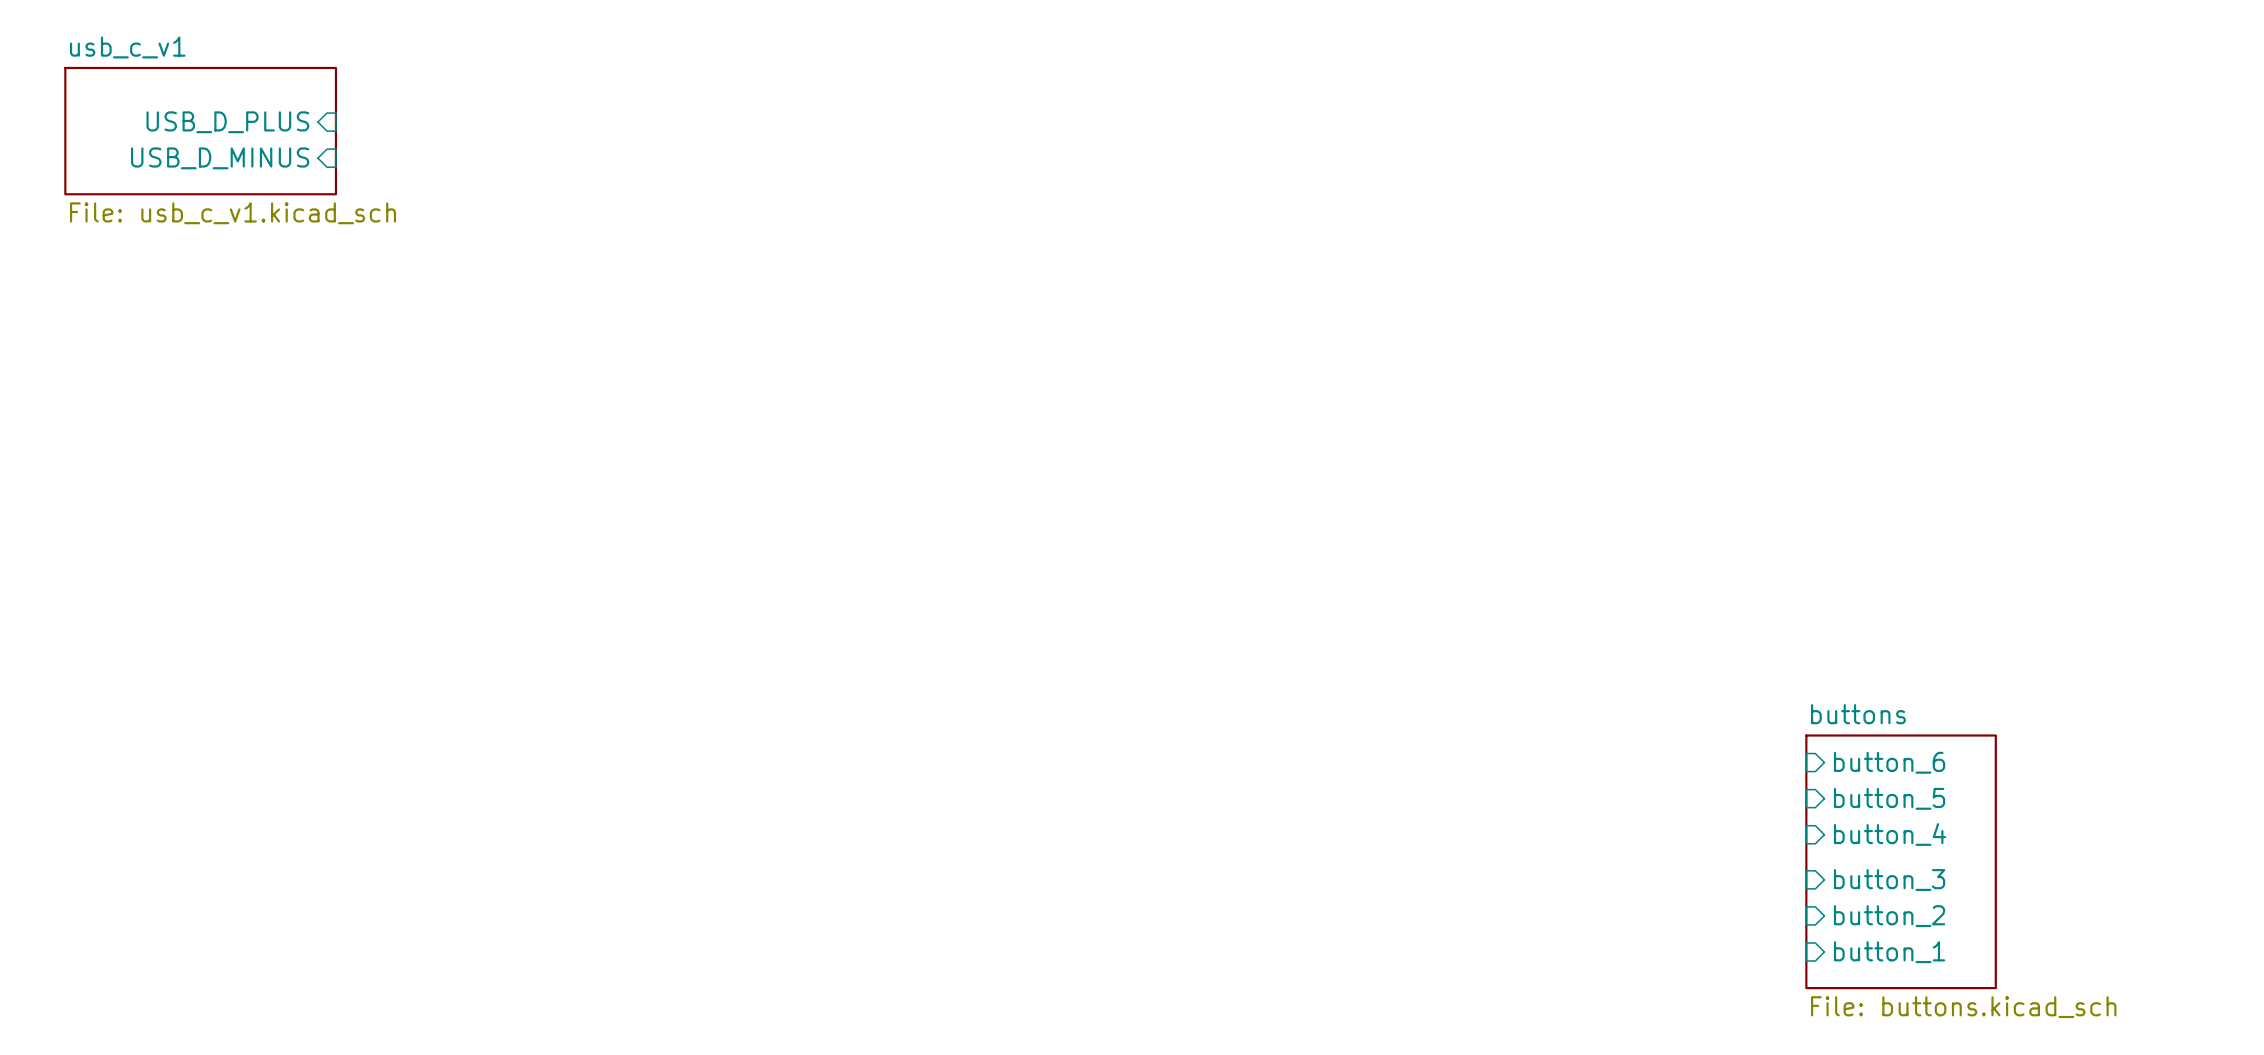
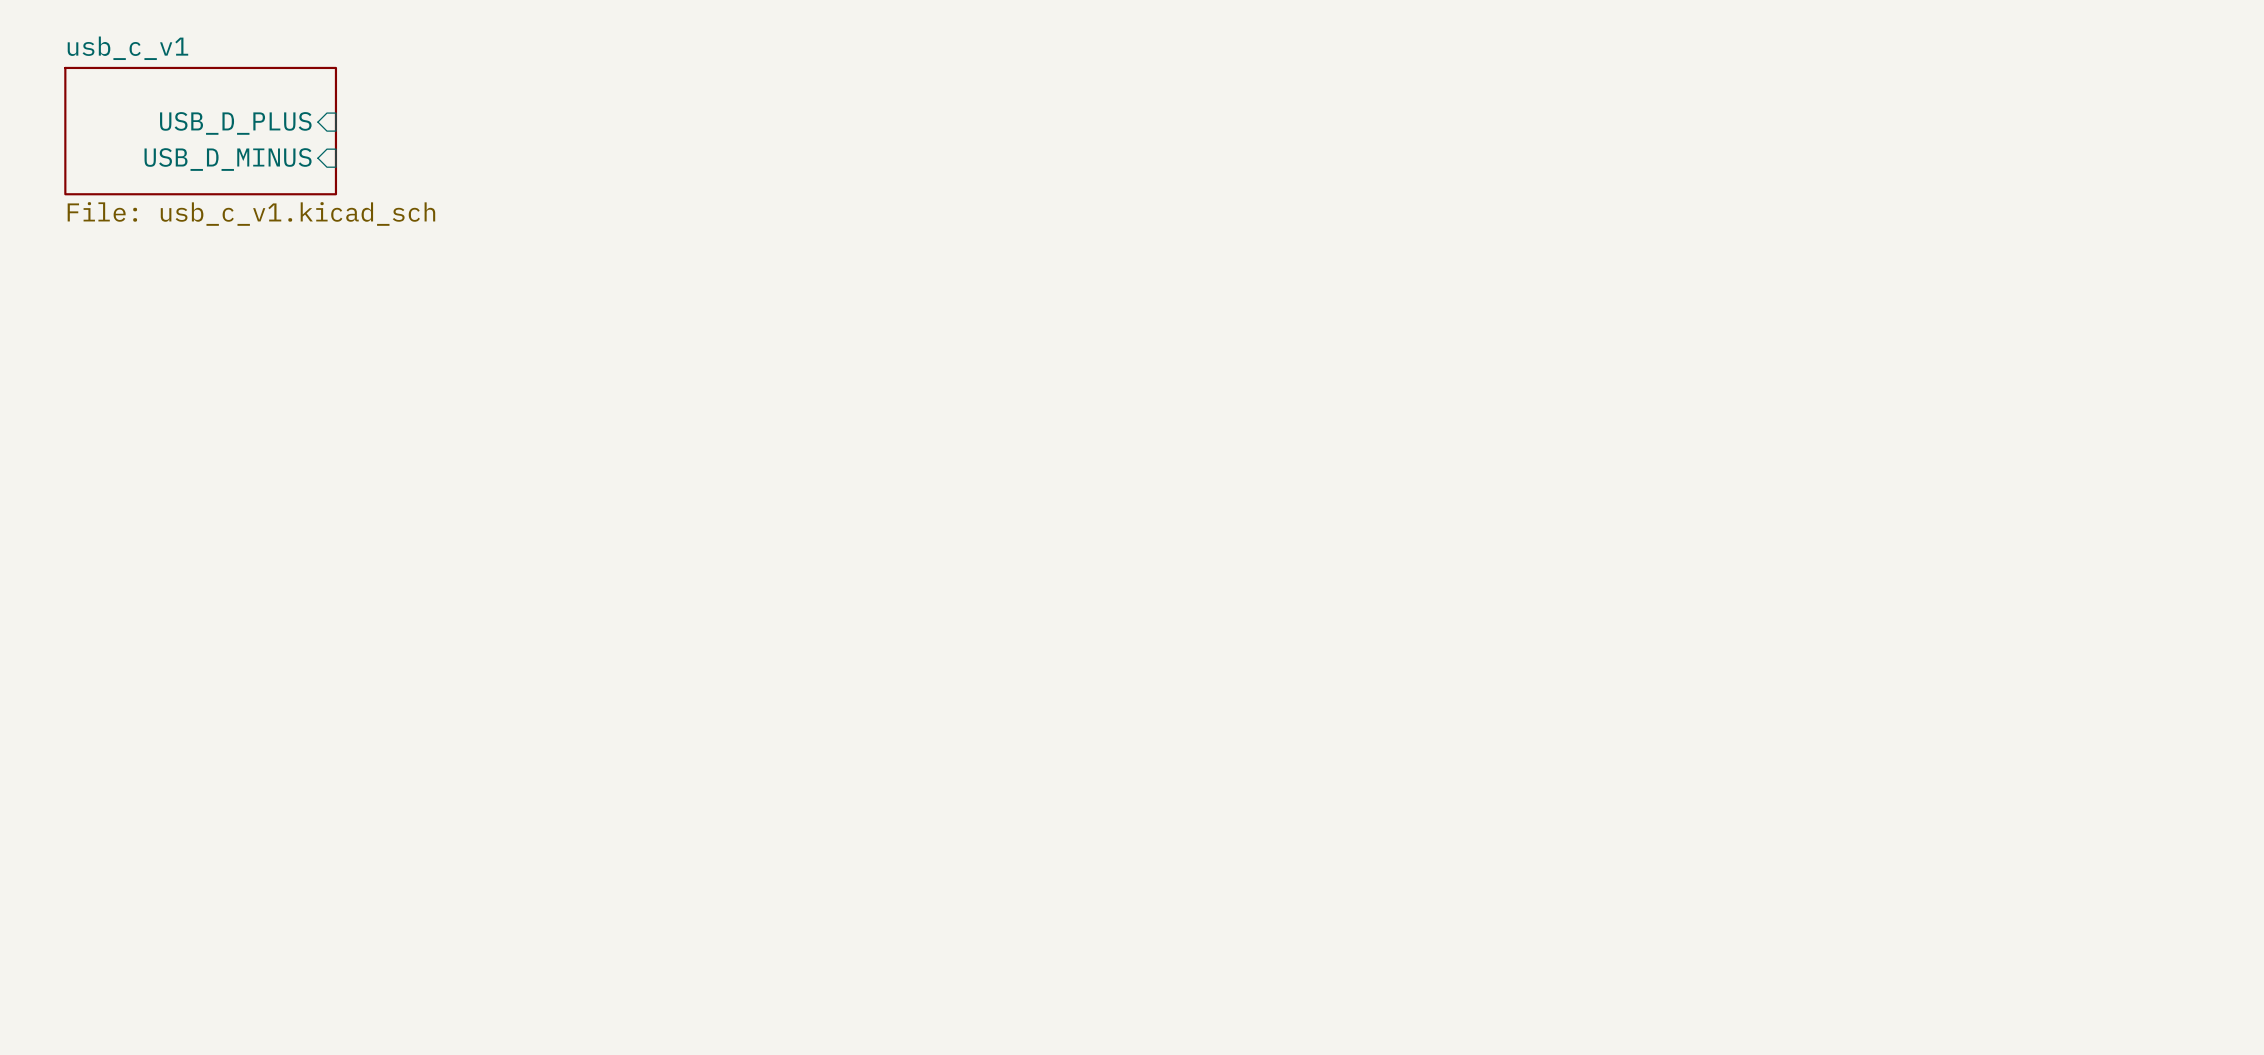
sheet pin: button_6 (1889, 762) -> none
sheet pin: button_5 (1889, 798) -> none
sheet pin: button_4 (1889, 834) -> none
sheet buttons: File: buttons.kicad_sch (1901, 861) -> none
sheet pin: button_3 (1889, 880) -> none
sheet pin: button_2 (1889, 916) -> none
sheet pin: button_1 (1889, 952) -> none

